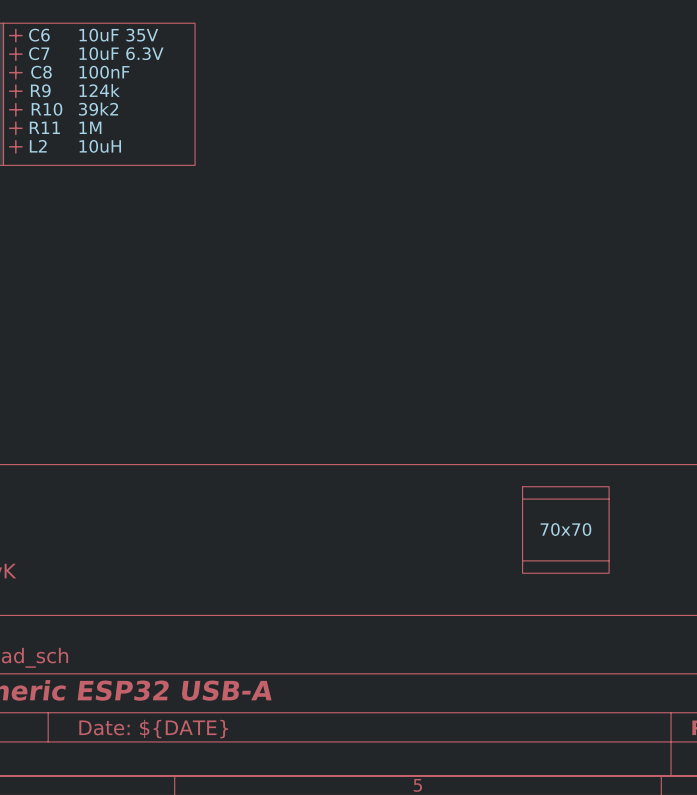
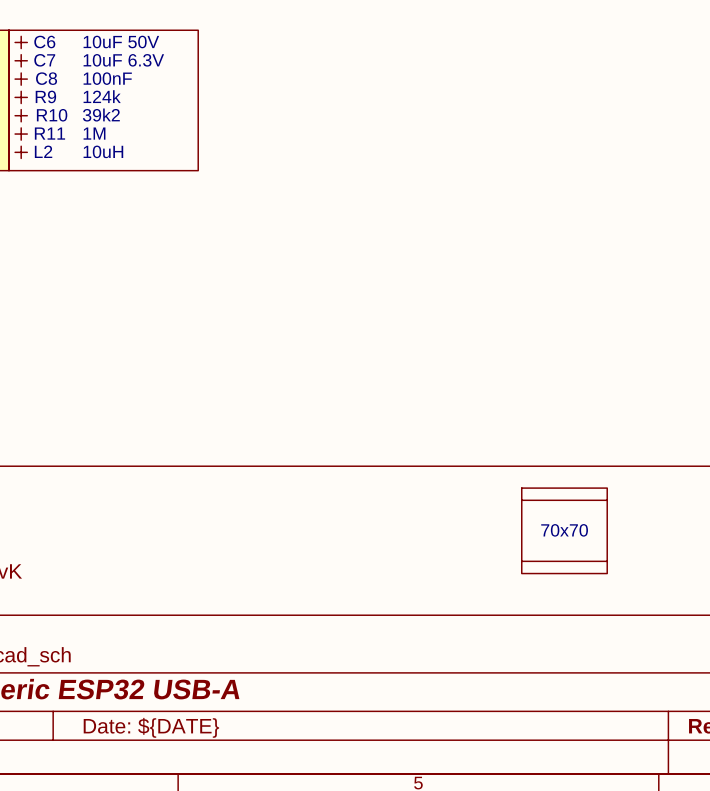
C6 value: 10uF 35V (118, 35) -> 10uF 50V (121, 42)

